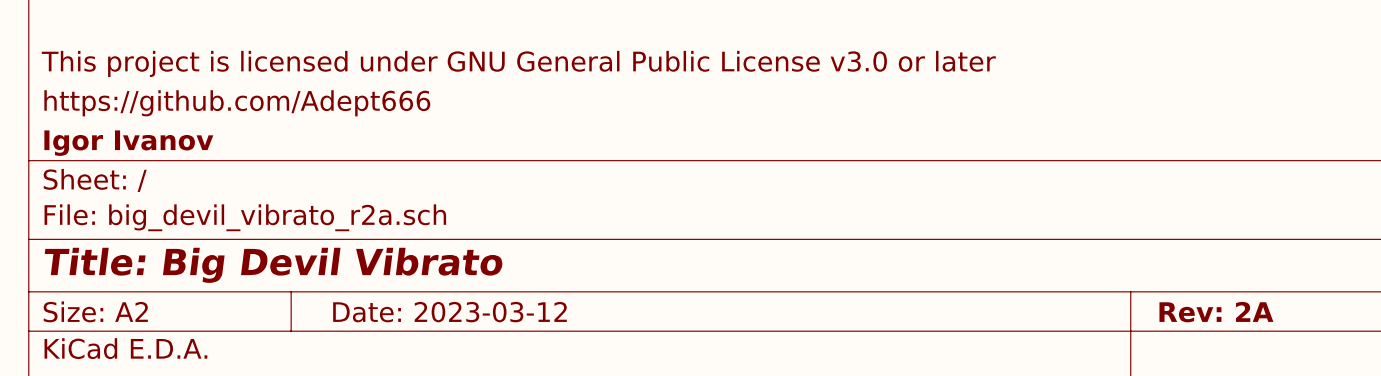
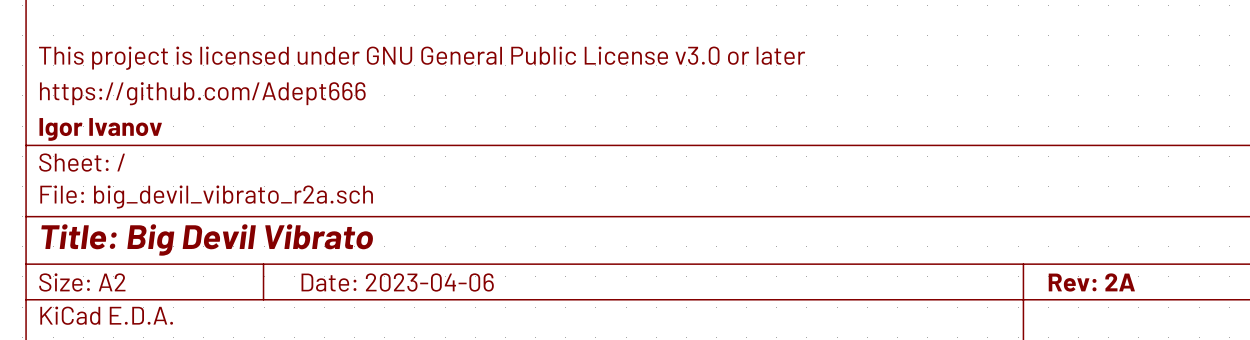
title block: Date: 2023-03-12 (450, 312) -> Date: 2023-04-06 (397, 282)

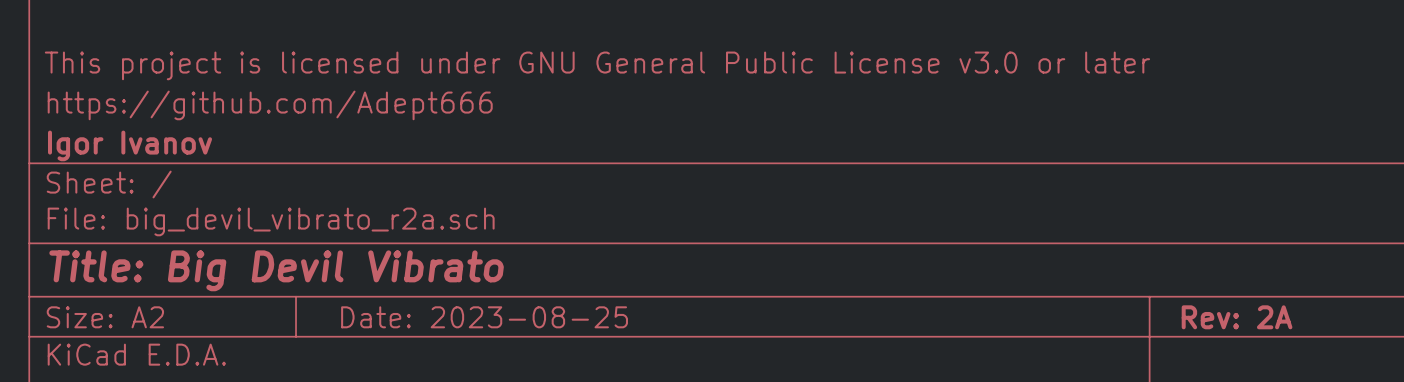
title block: Date: 2023-04-06 (397, 282) -> Date: 2023-08-25 (484, 317)

